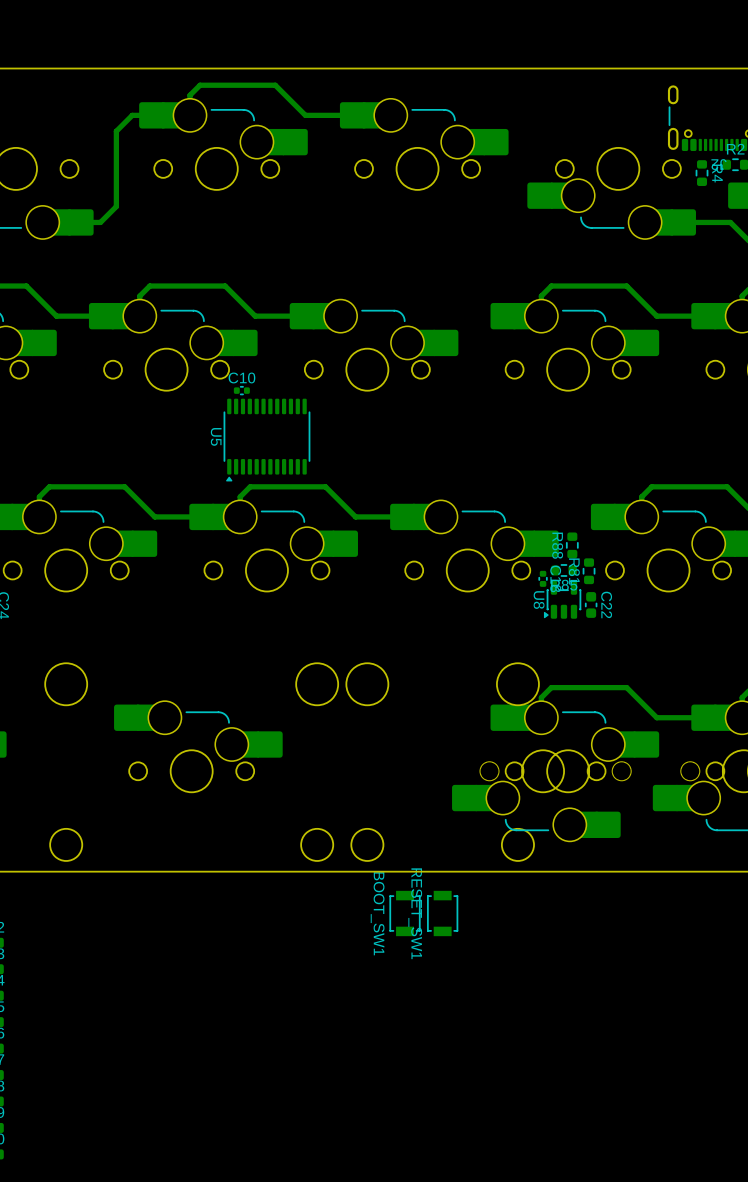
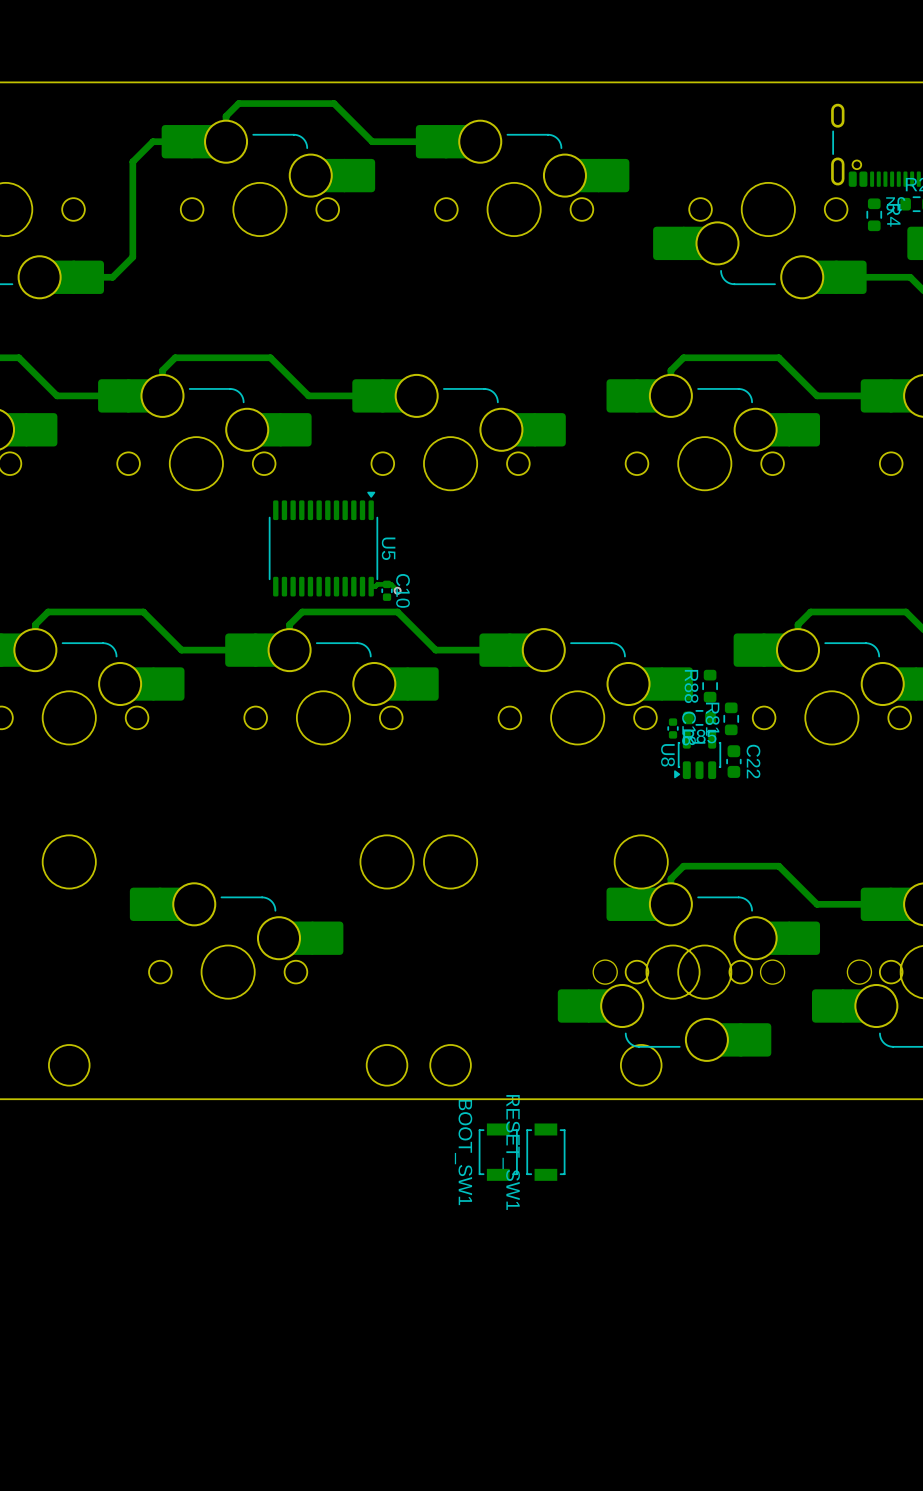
C10 rotation: 0° (241, 390) -> 90° clockwise (387, 590)
C10 position: (241, 390) -> (387, 590)
U5 rotation: 0° (266, 440) -> 180° (323, 544)
track: none -> (371, 586) (377, 584) (391, 584) (397, 590)
via: none -> (397, 590)

